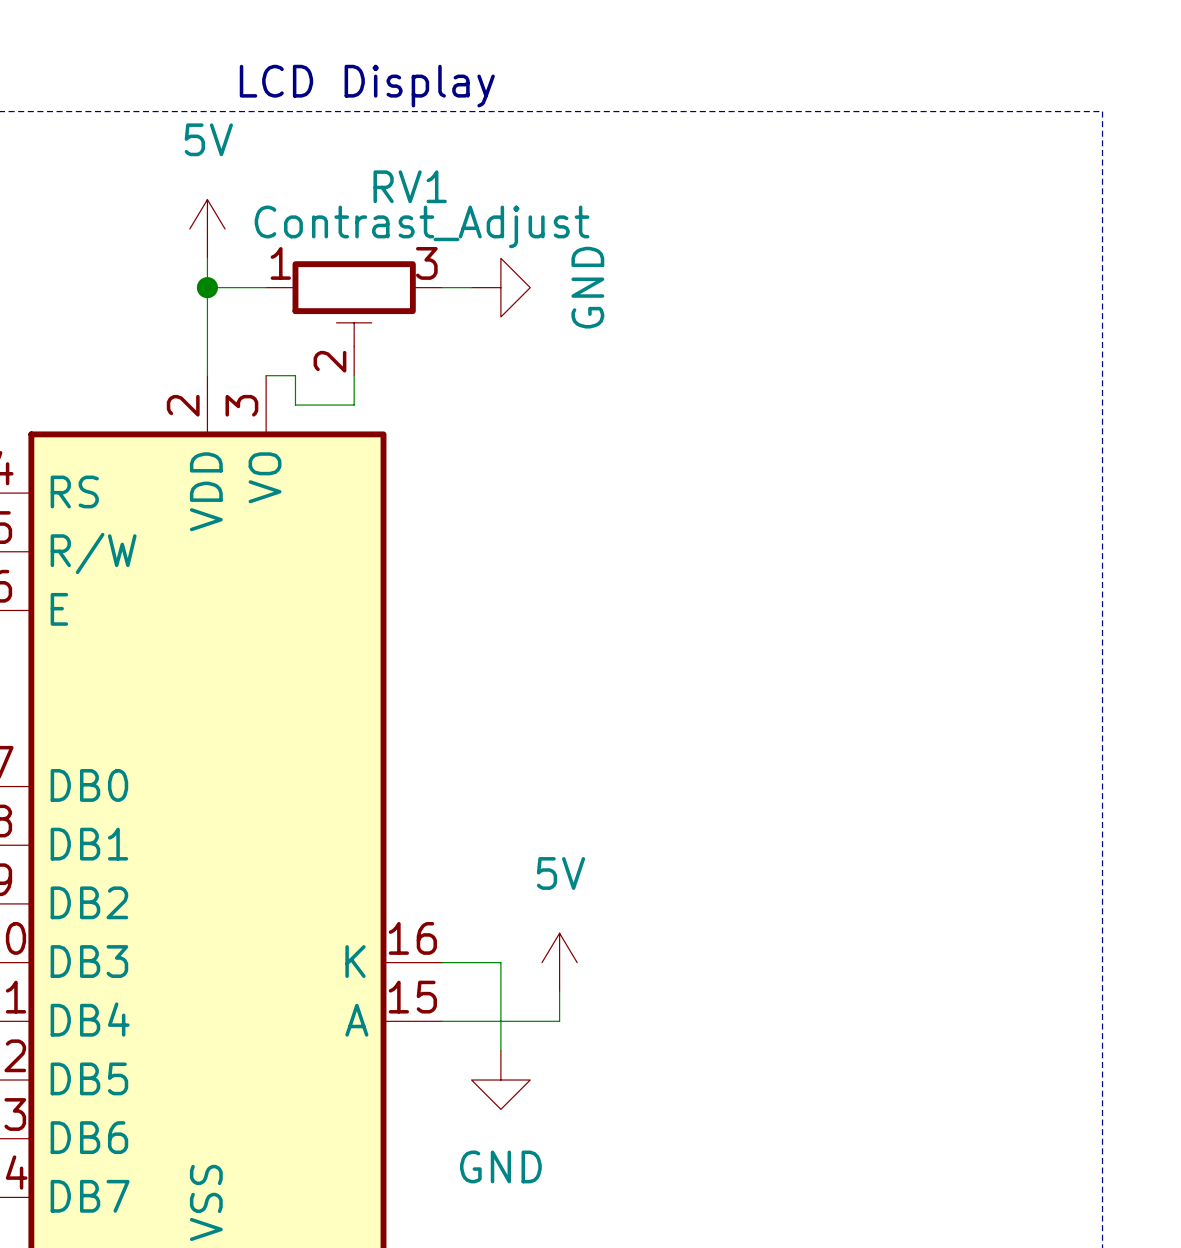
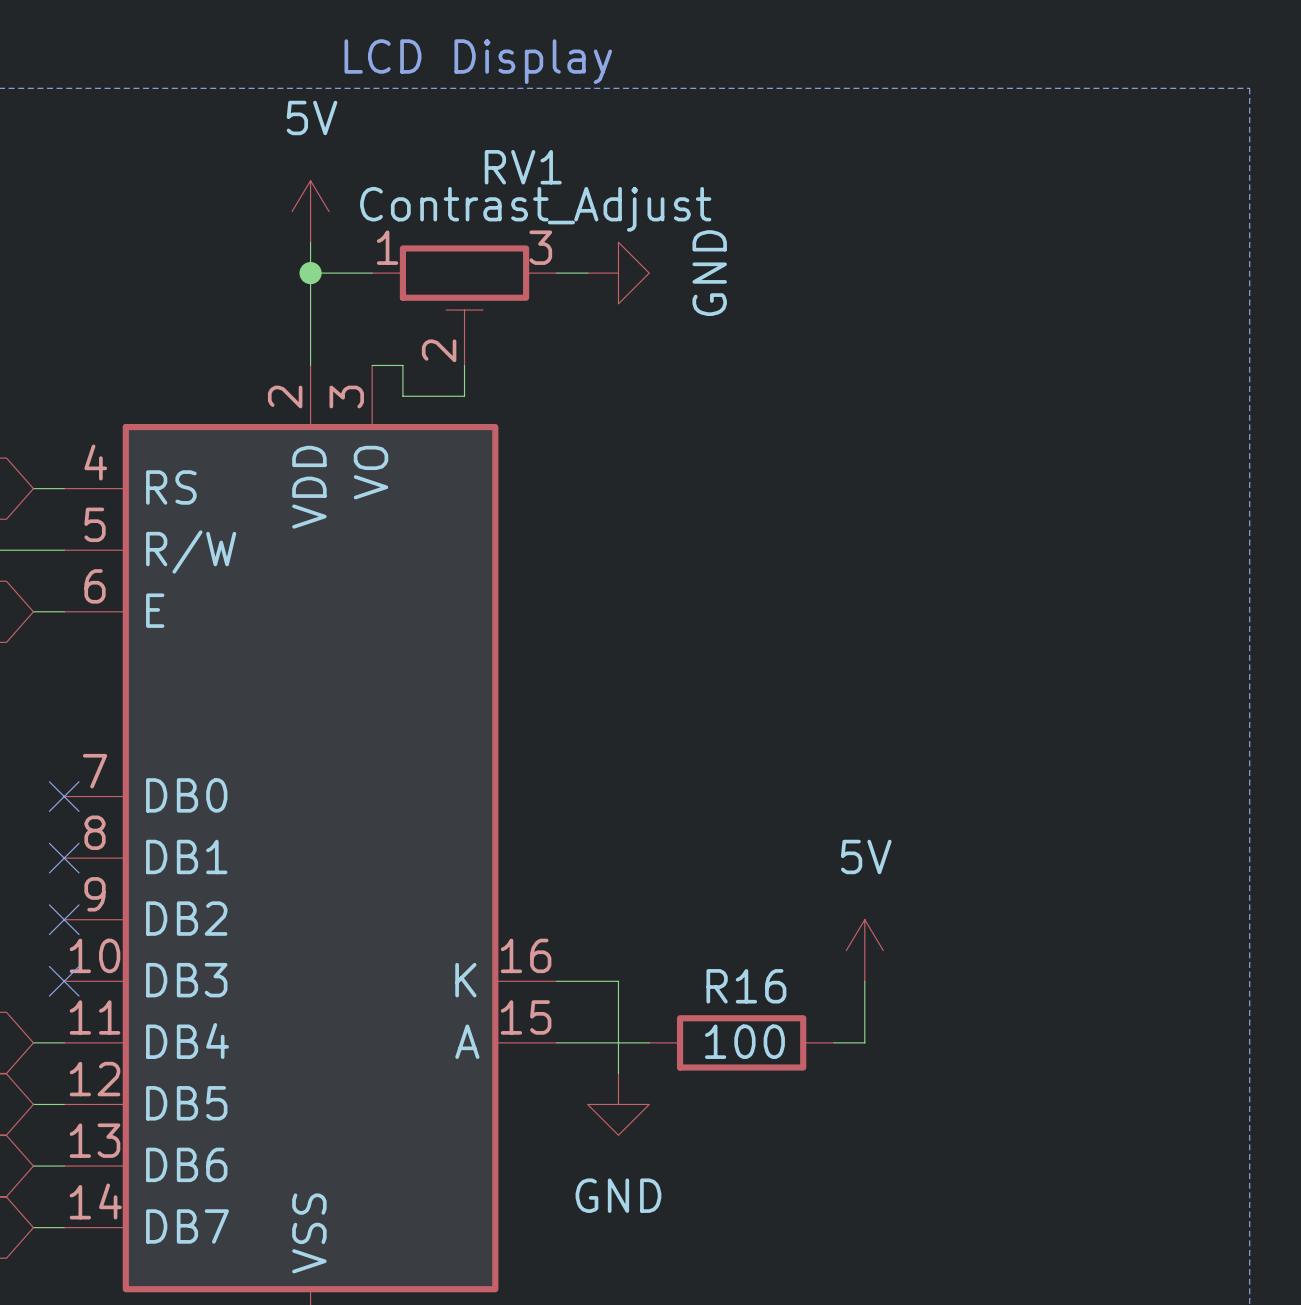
power symbol position: 5V (559, 962) -> 5V (864, 950)
wire: none -> (864, 981) (864, 1042) (834, 1042)
R16: none -> 100 (741, 1042)

